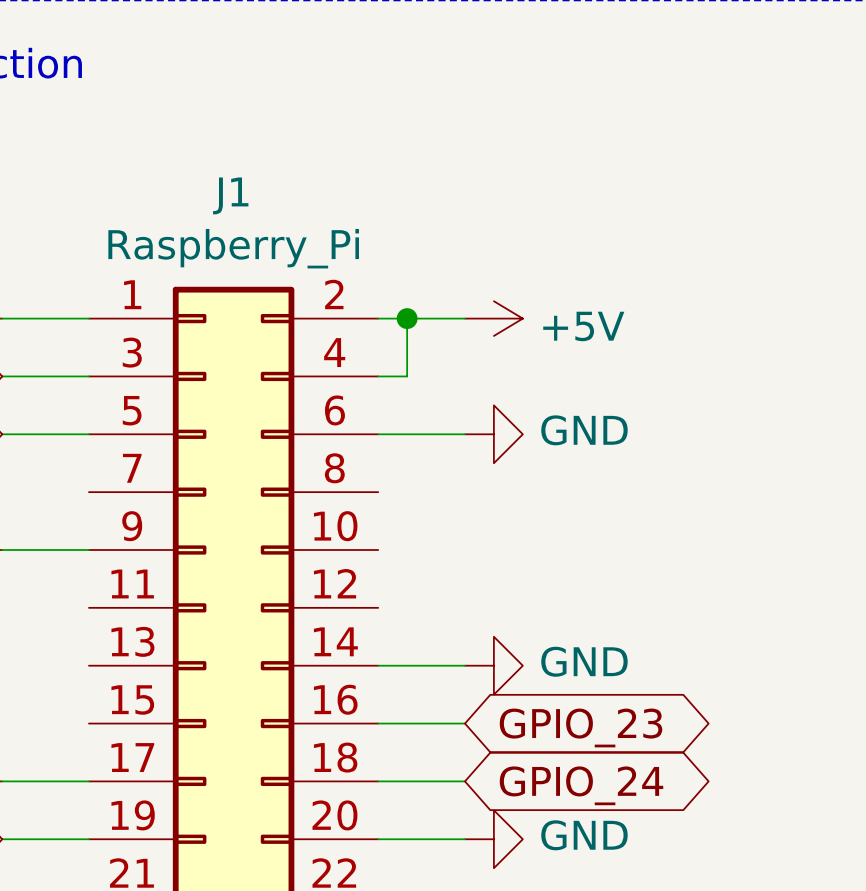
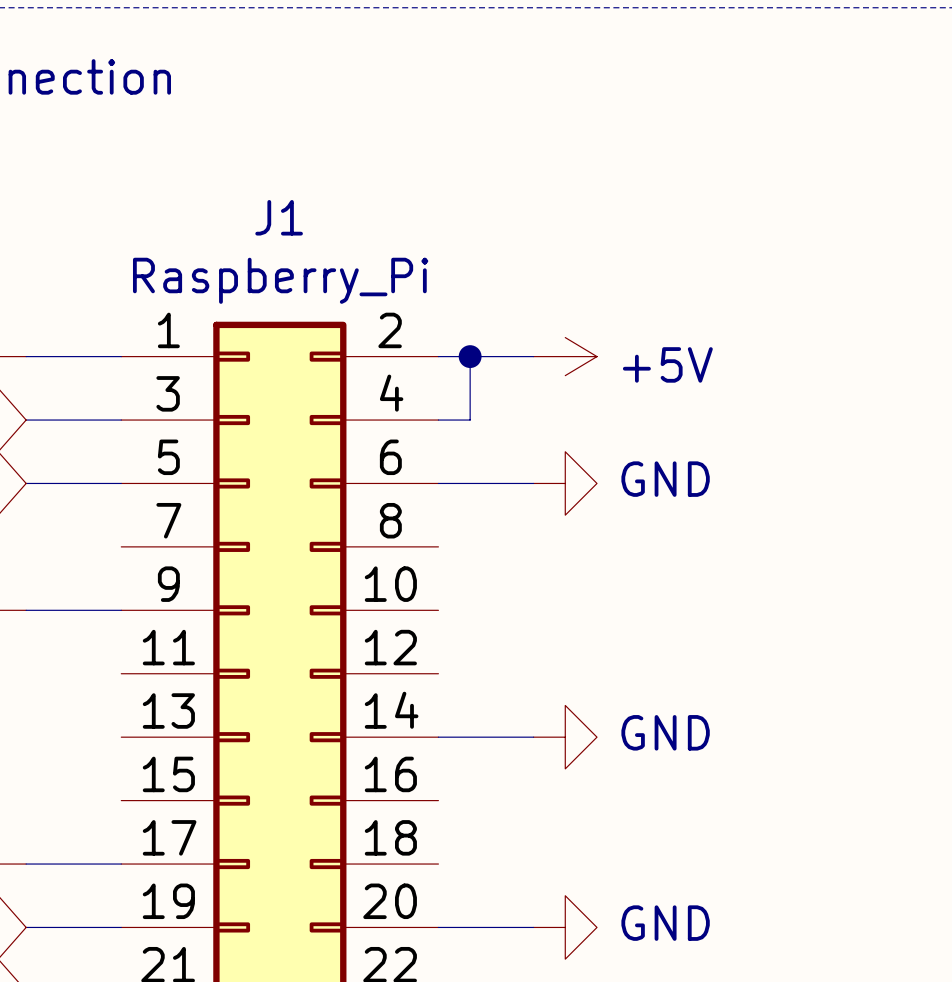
wire: (378, 723) (464, 723) -> none
global label: GPIO_23 (581, 727) -> none
wire: (378, 781) (464, 781) -> none
global label: GPIO_24 (581, 785) -> none

